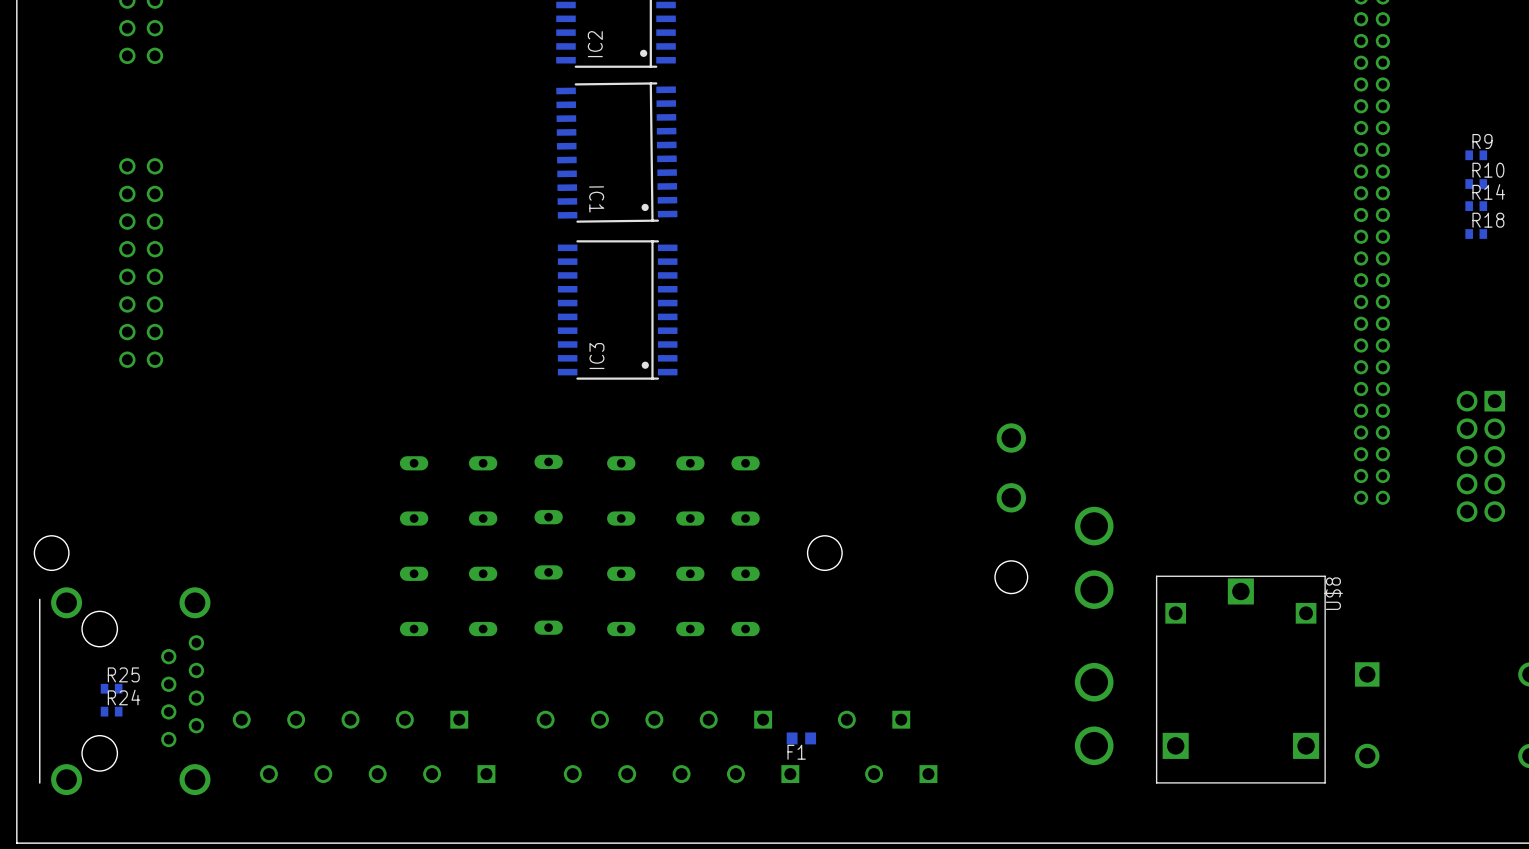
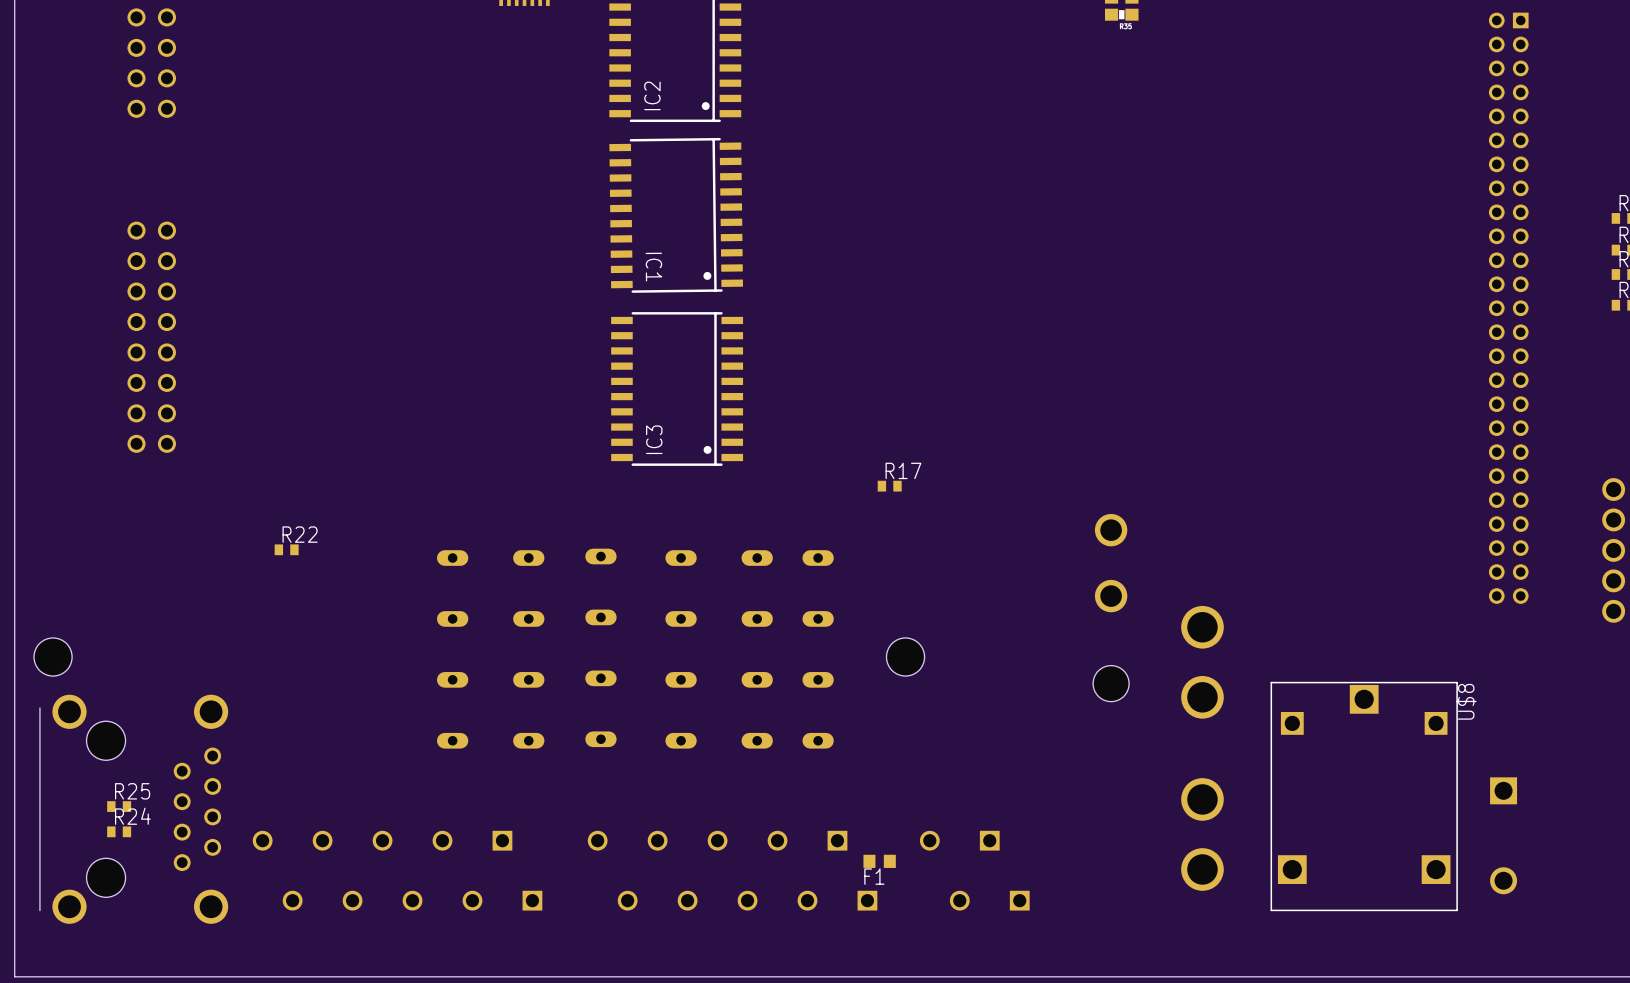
R17: none -> (889, 486)
R22: none -> (286, 549)

